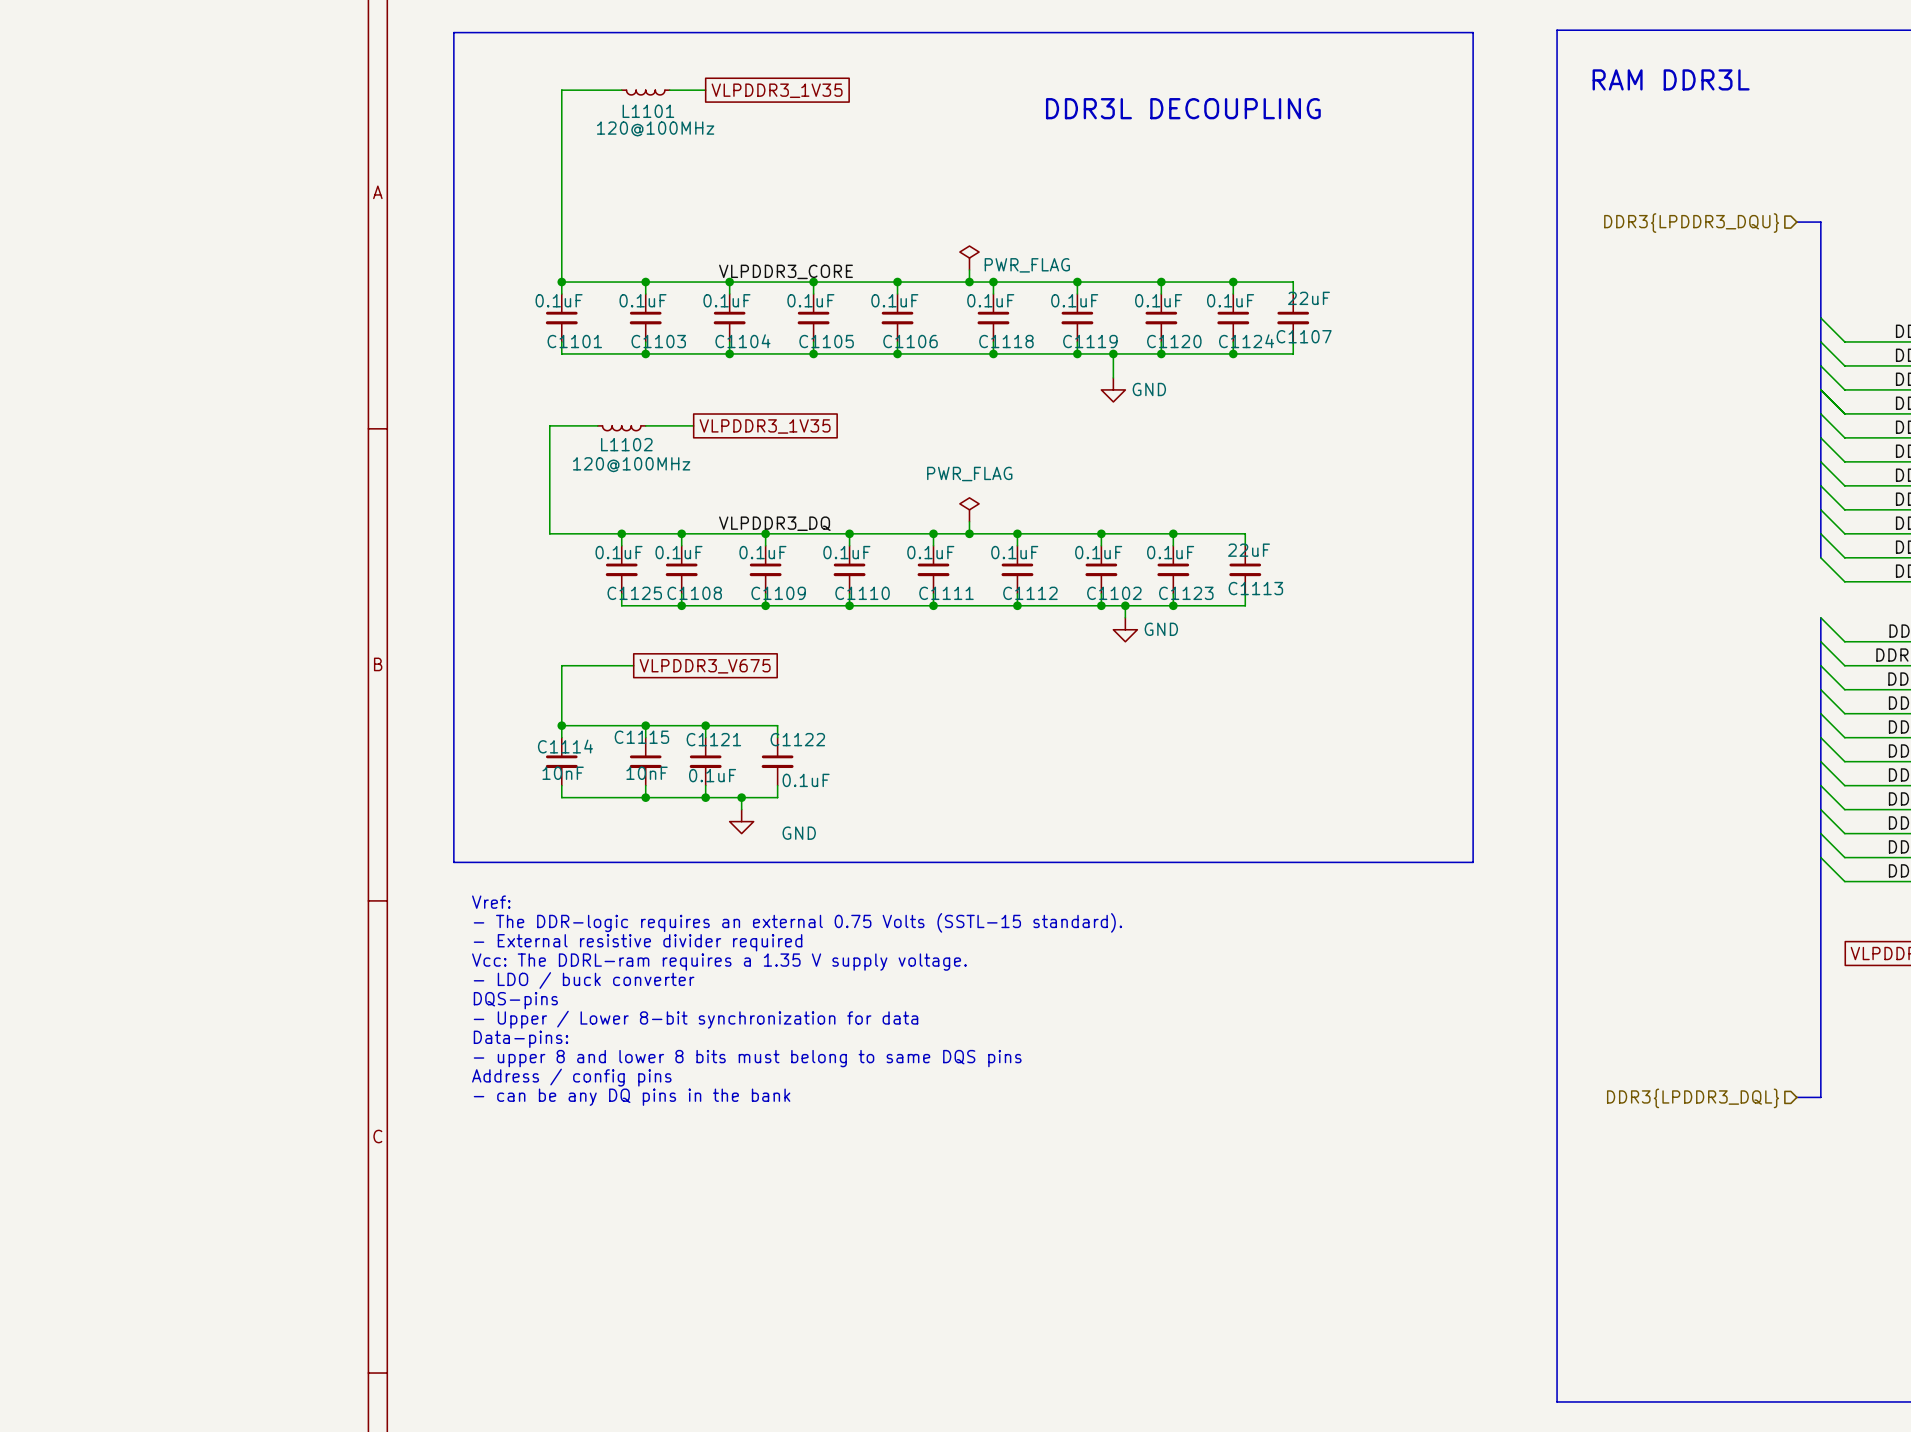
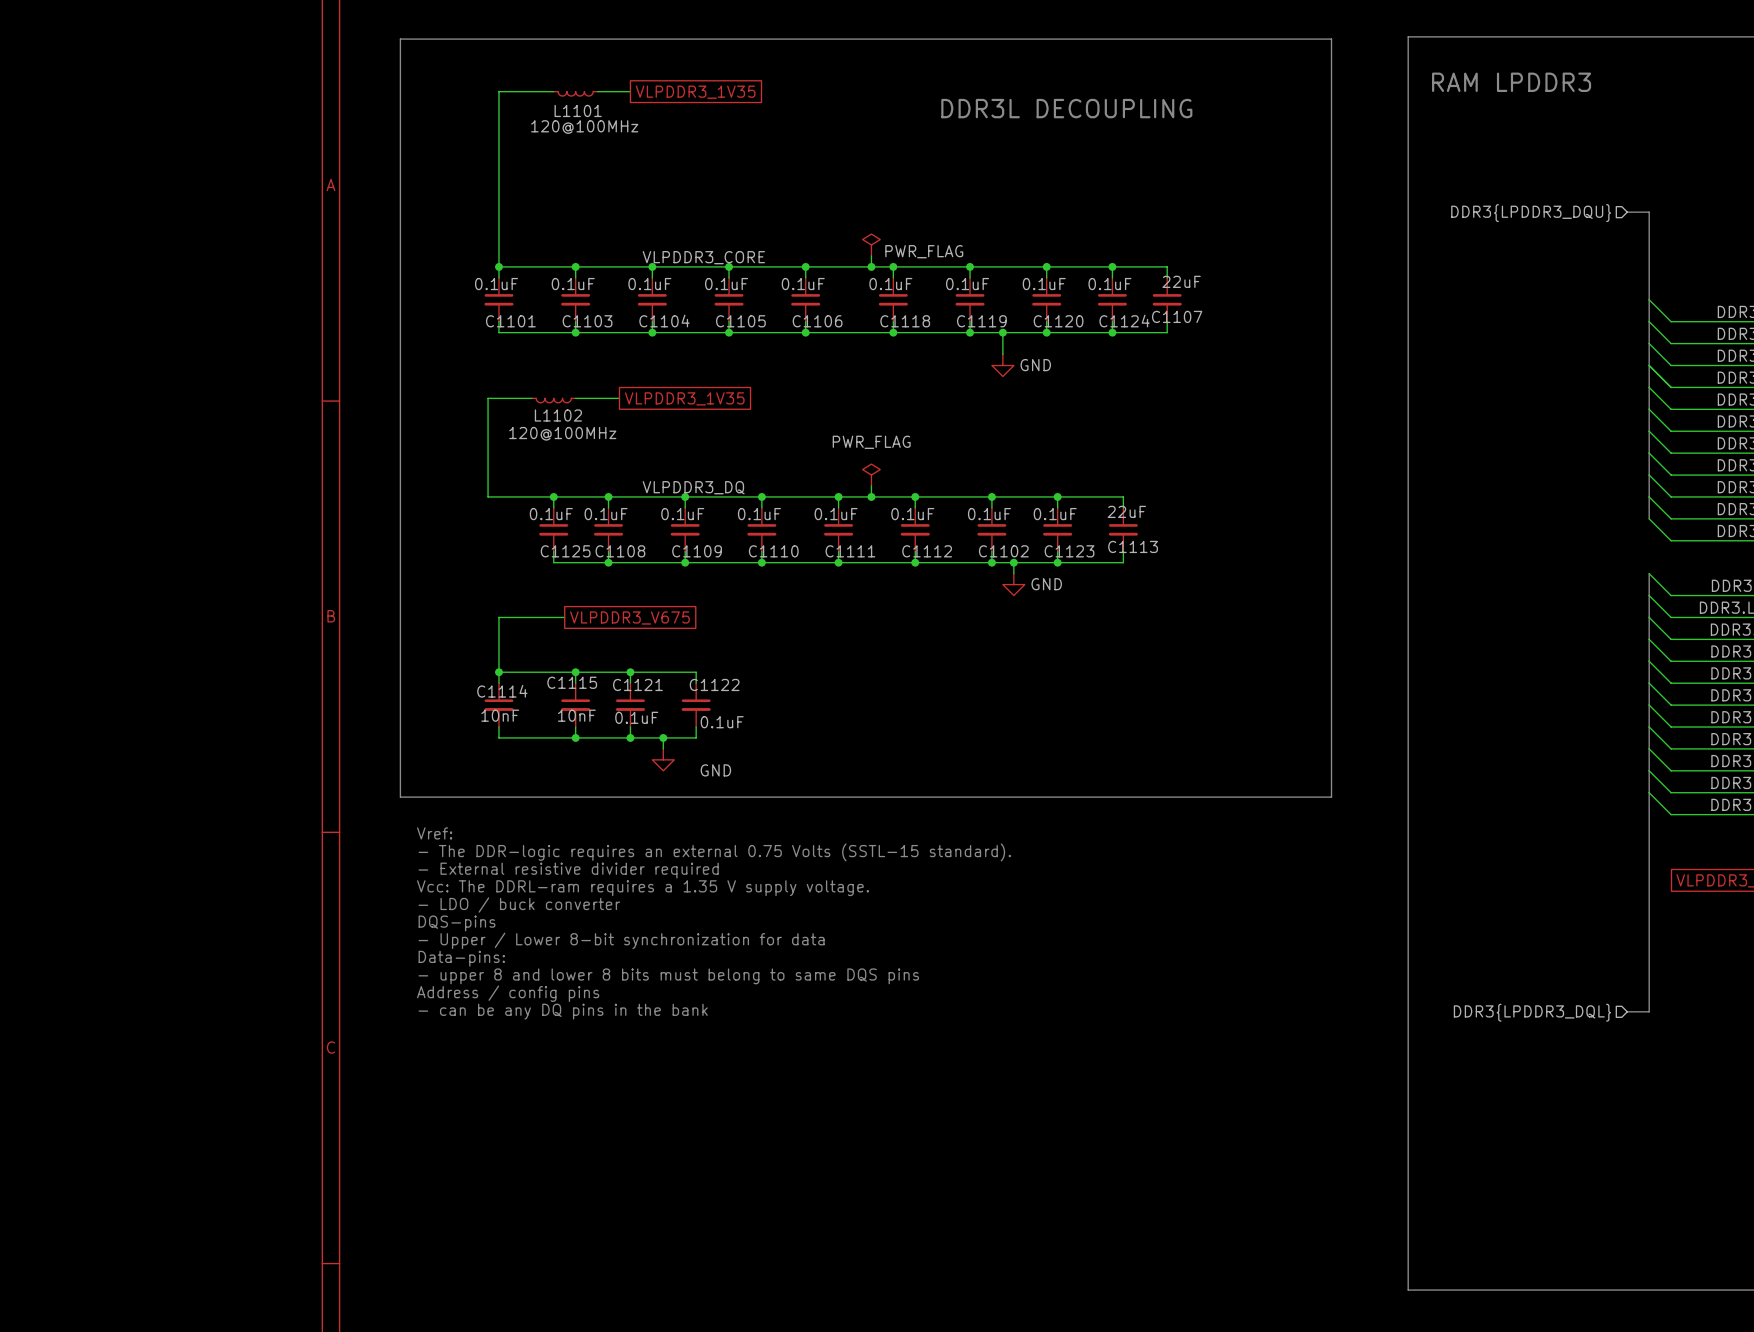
text: RAM DDR3L (1671, 79) -> RAM LPDDR3 (1511, 82)

